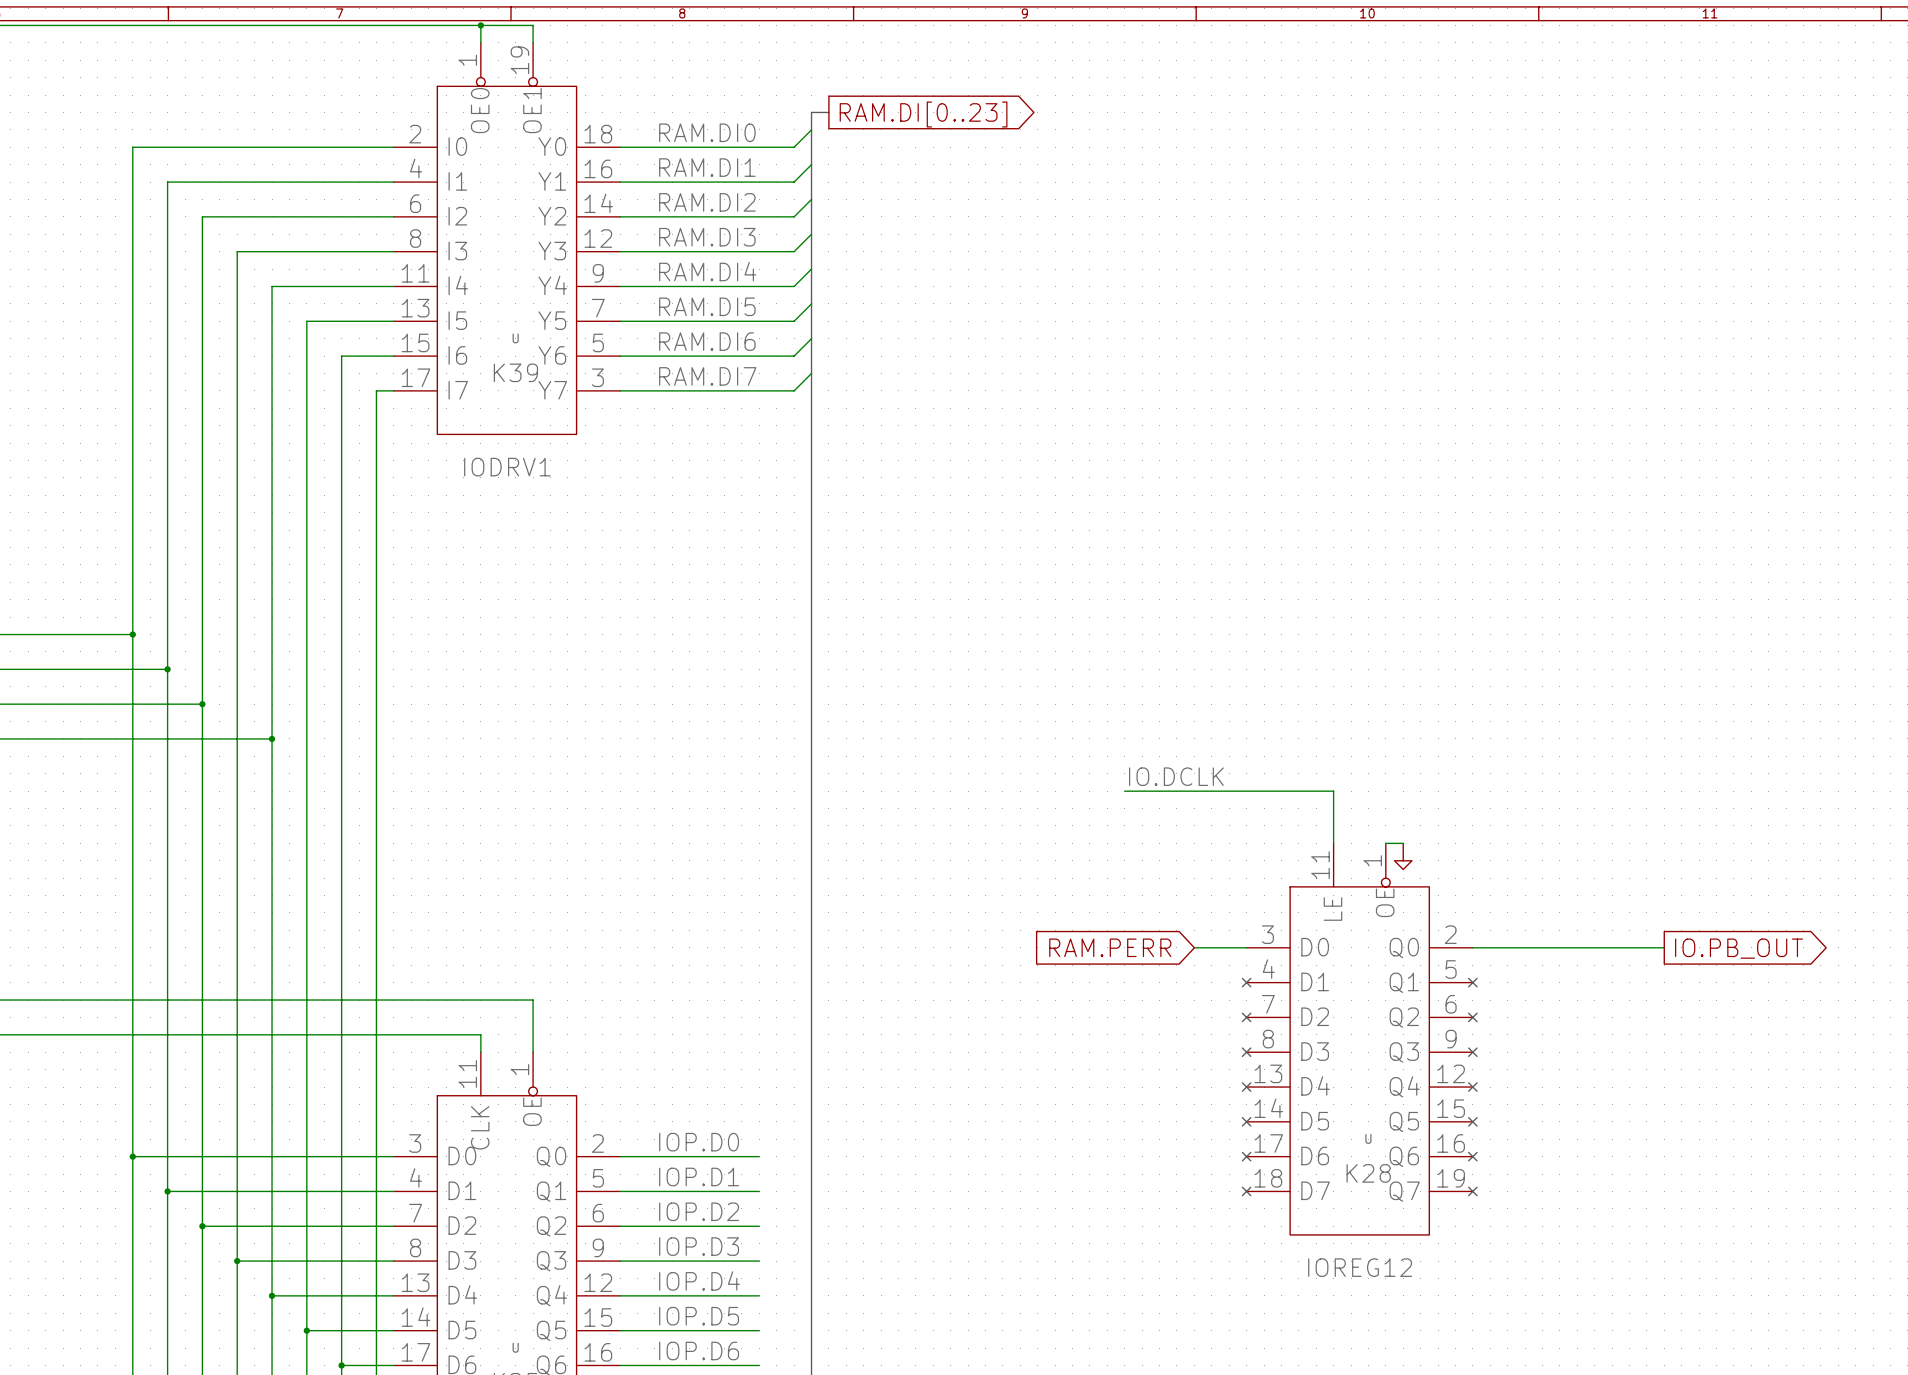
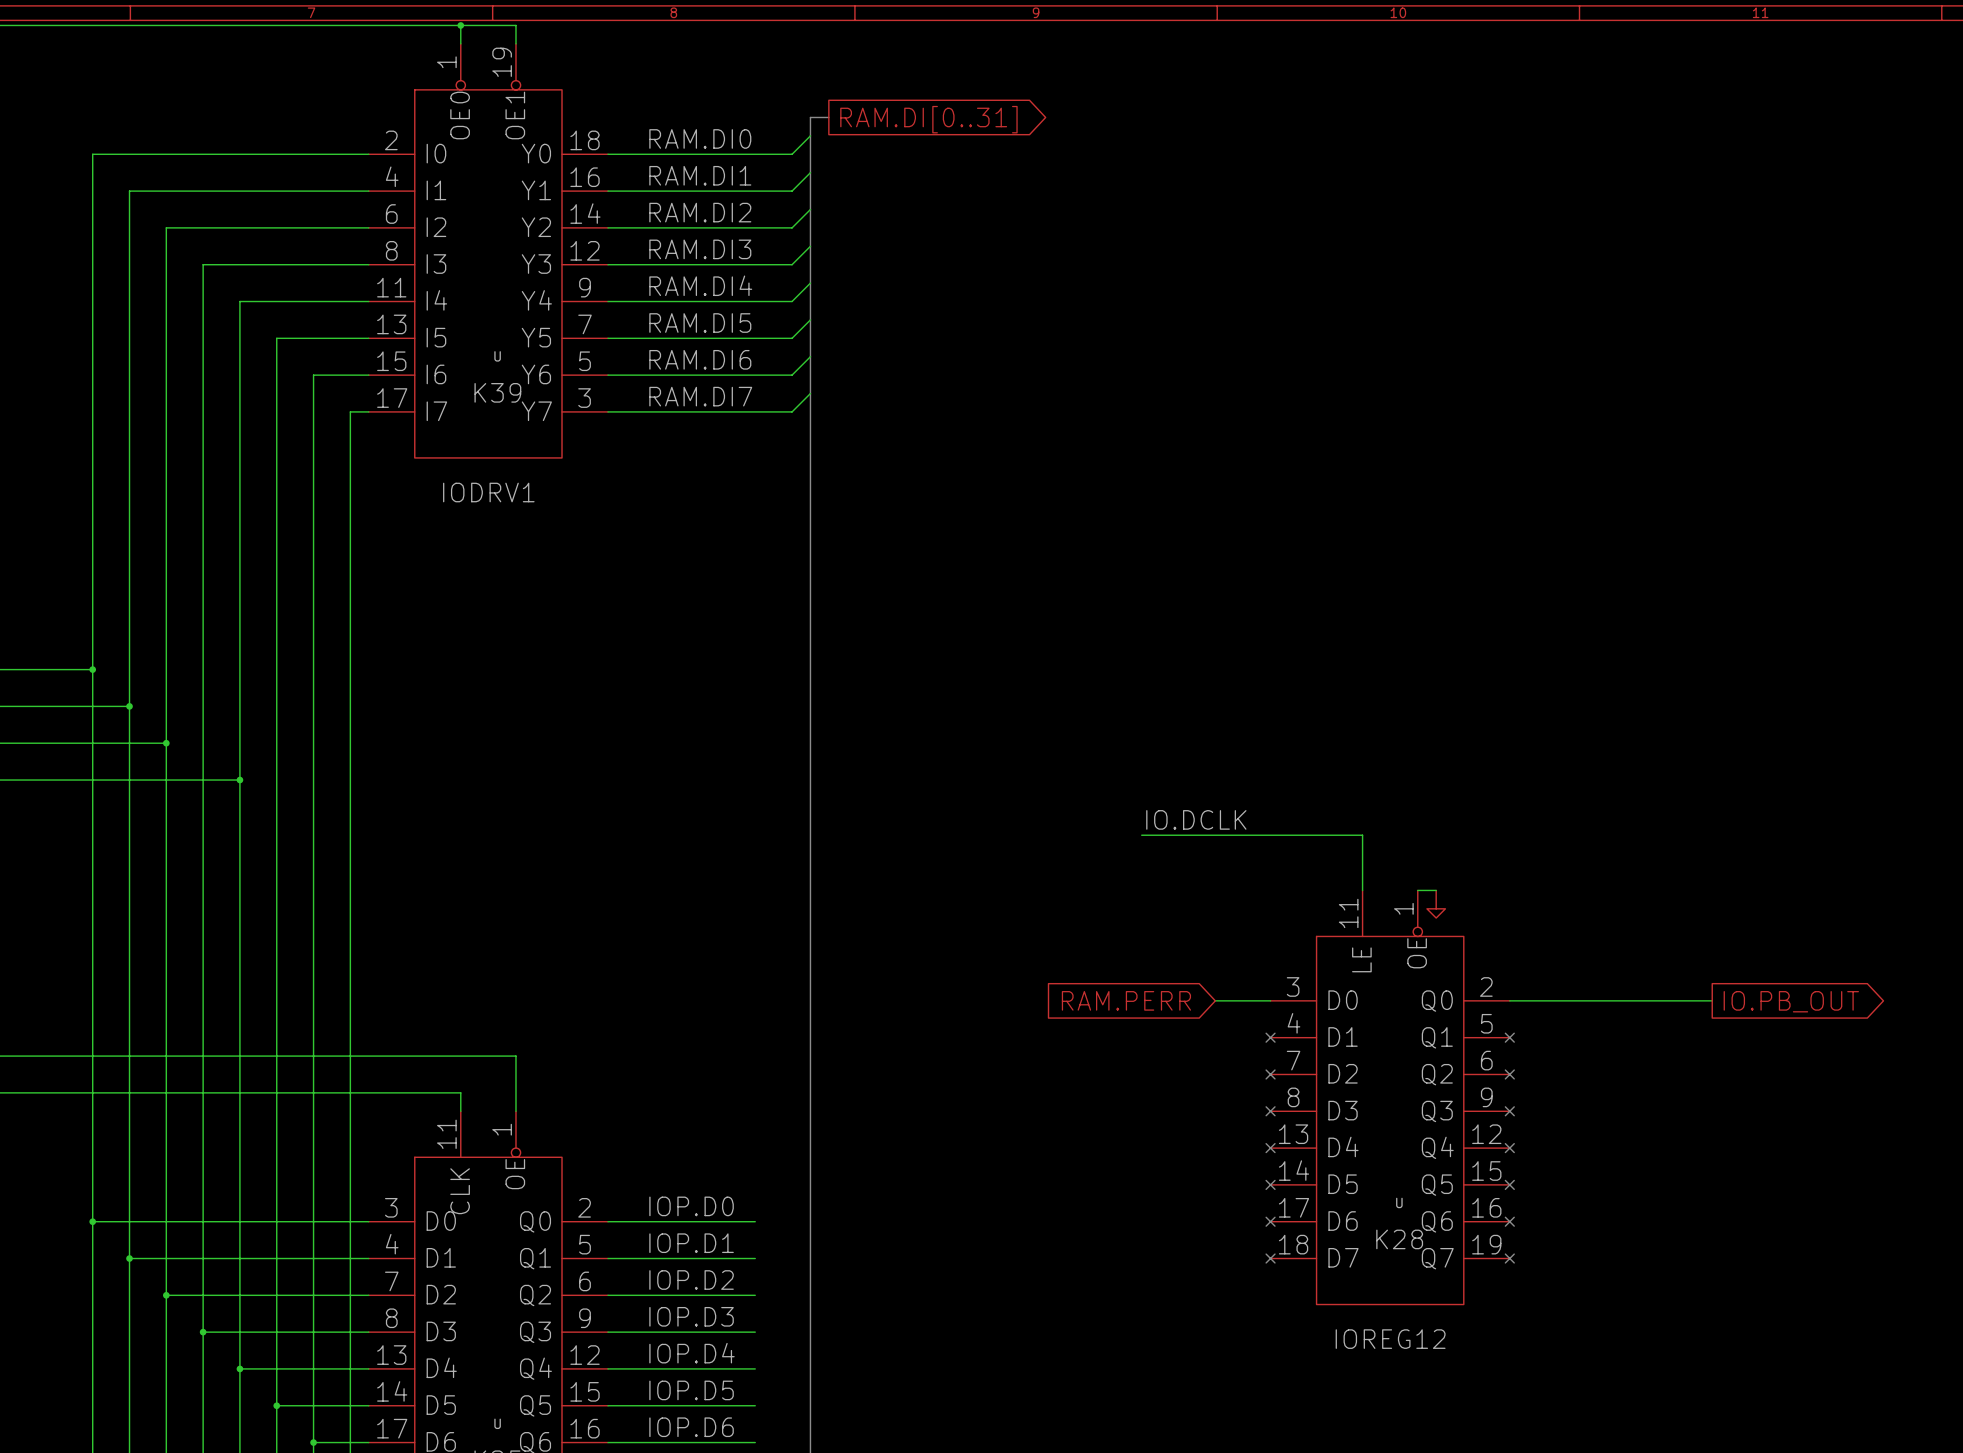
global label: RAM.DI[0..23] (923, 114) -> RAM.DI[0..31] (928, 119)

